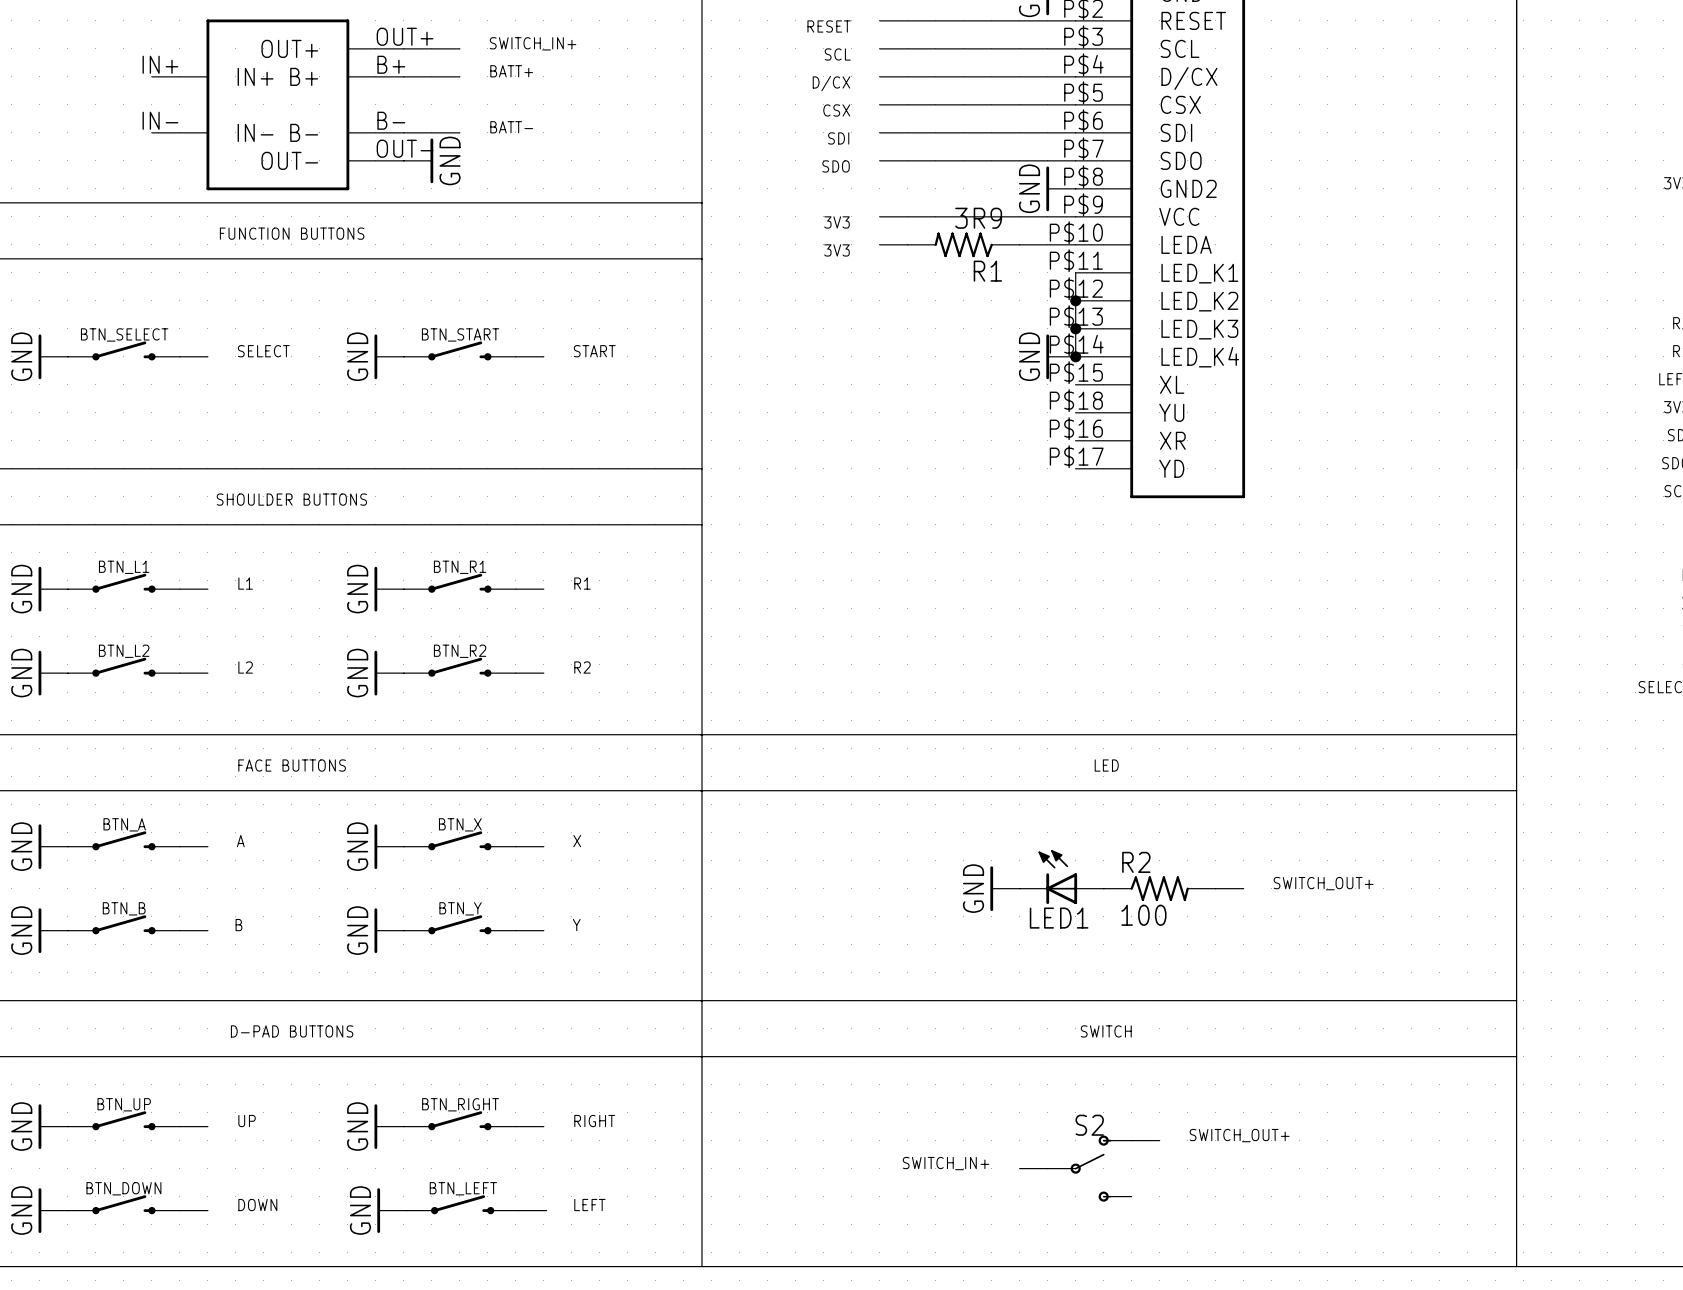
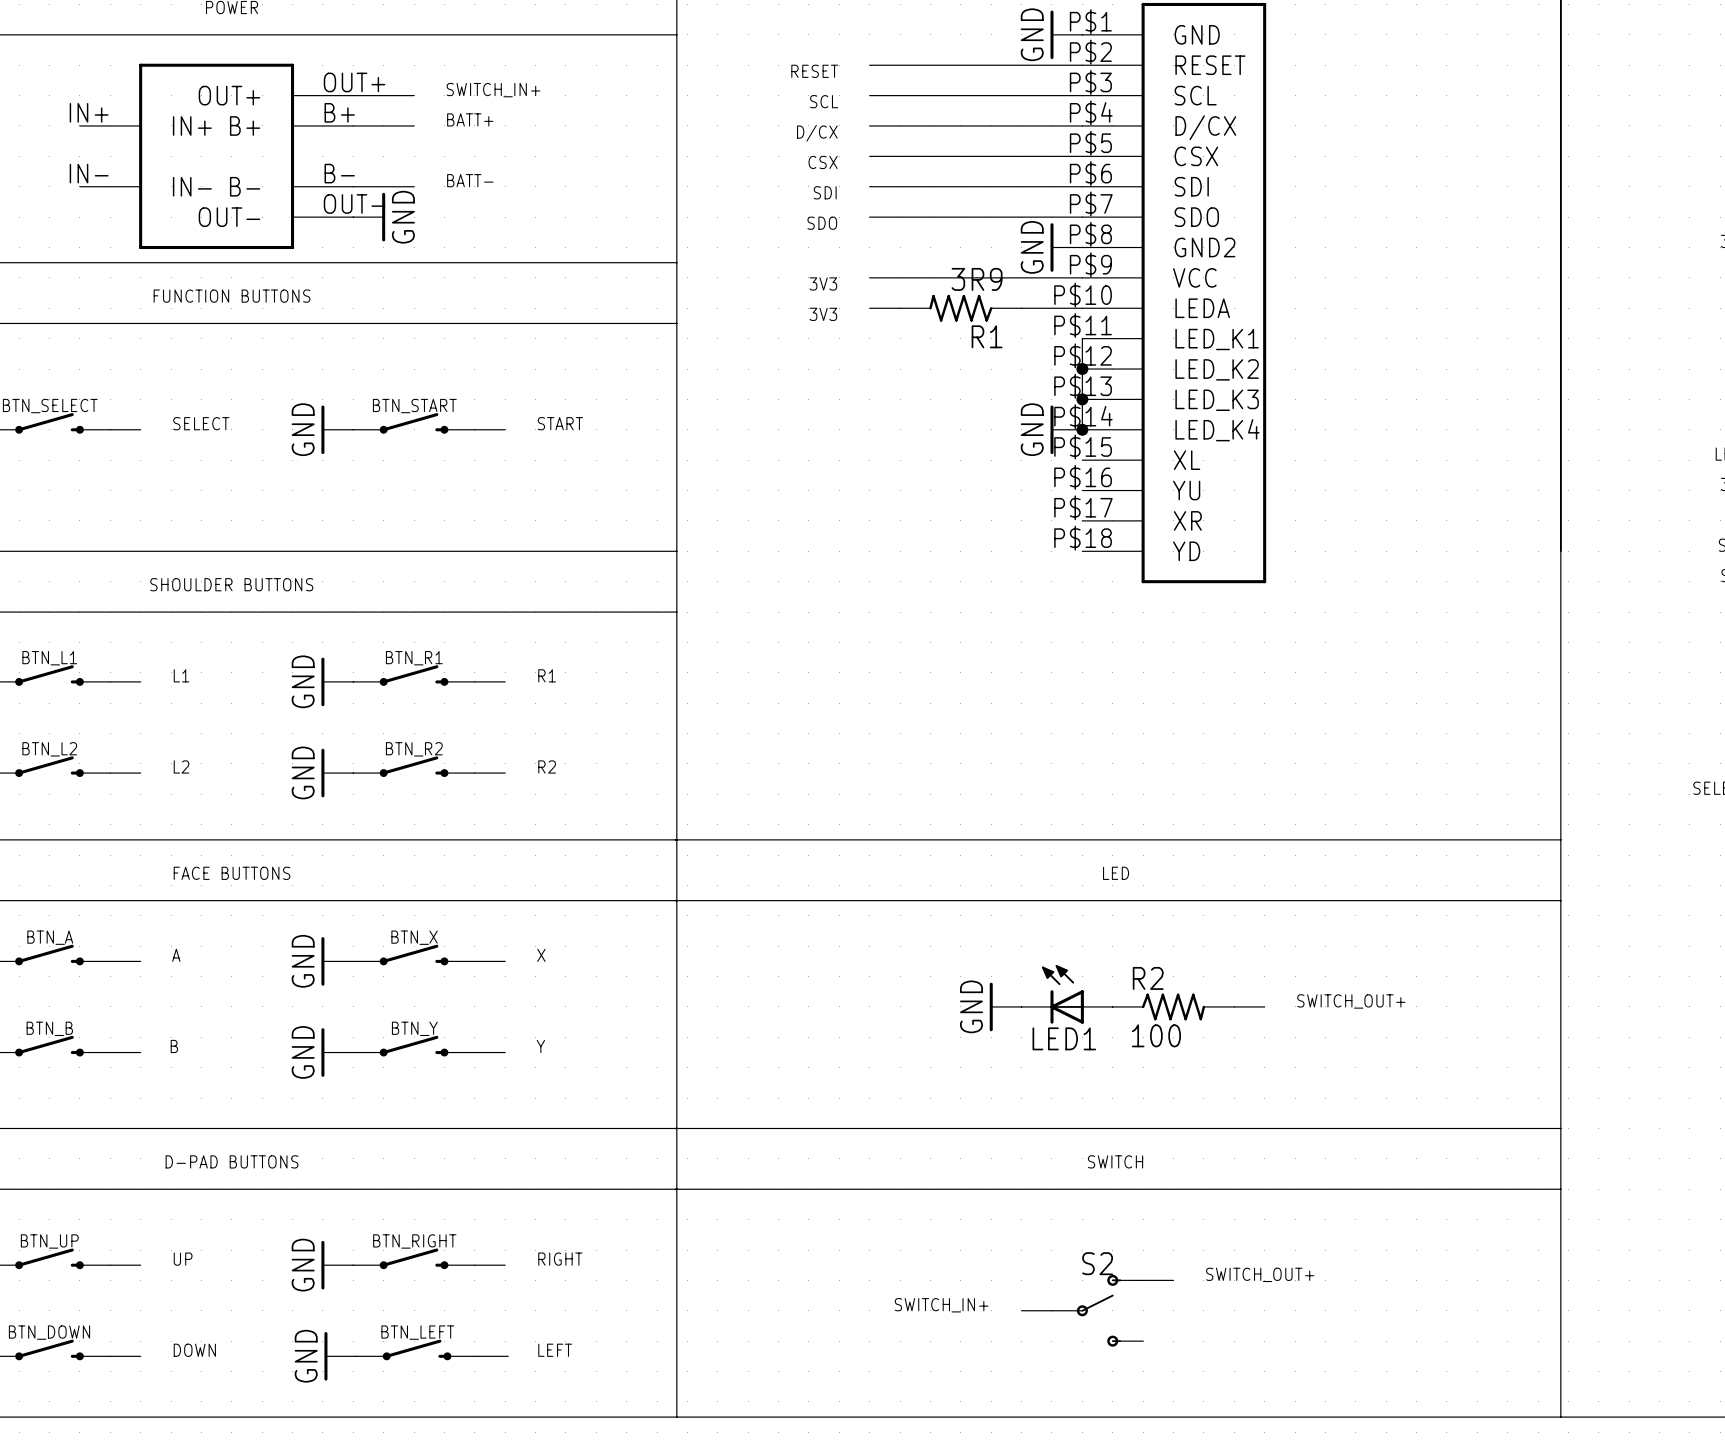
part pin number: P$18 (1076, 400) -> P$16 (1083, 477)
part pin number: P$16 (1076, 428) -> P$17 (1083, 507)
part pin number: P$17 (1076, 456) -> P$18 (1083, 538)

